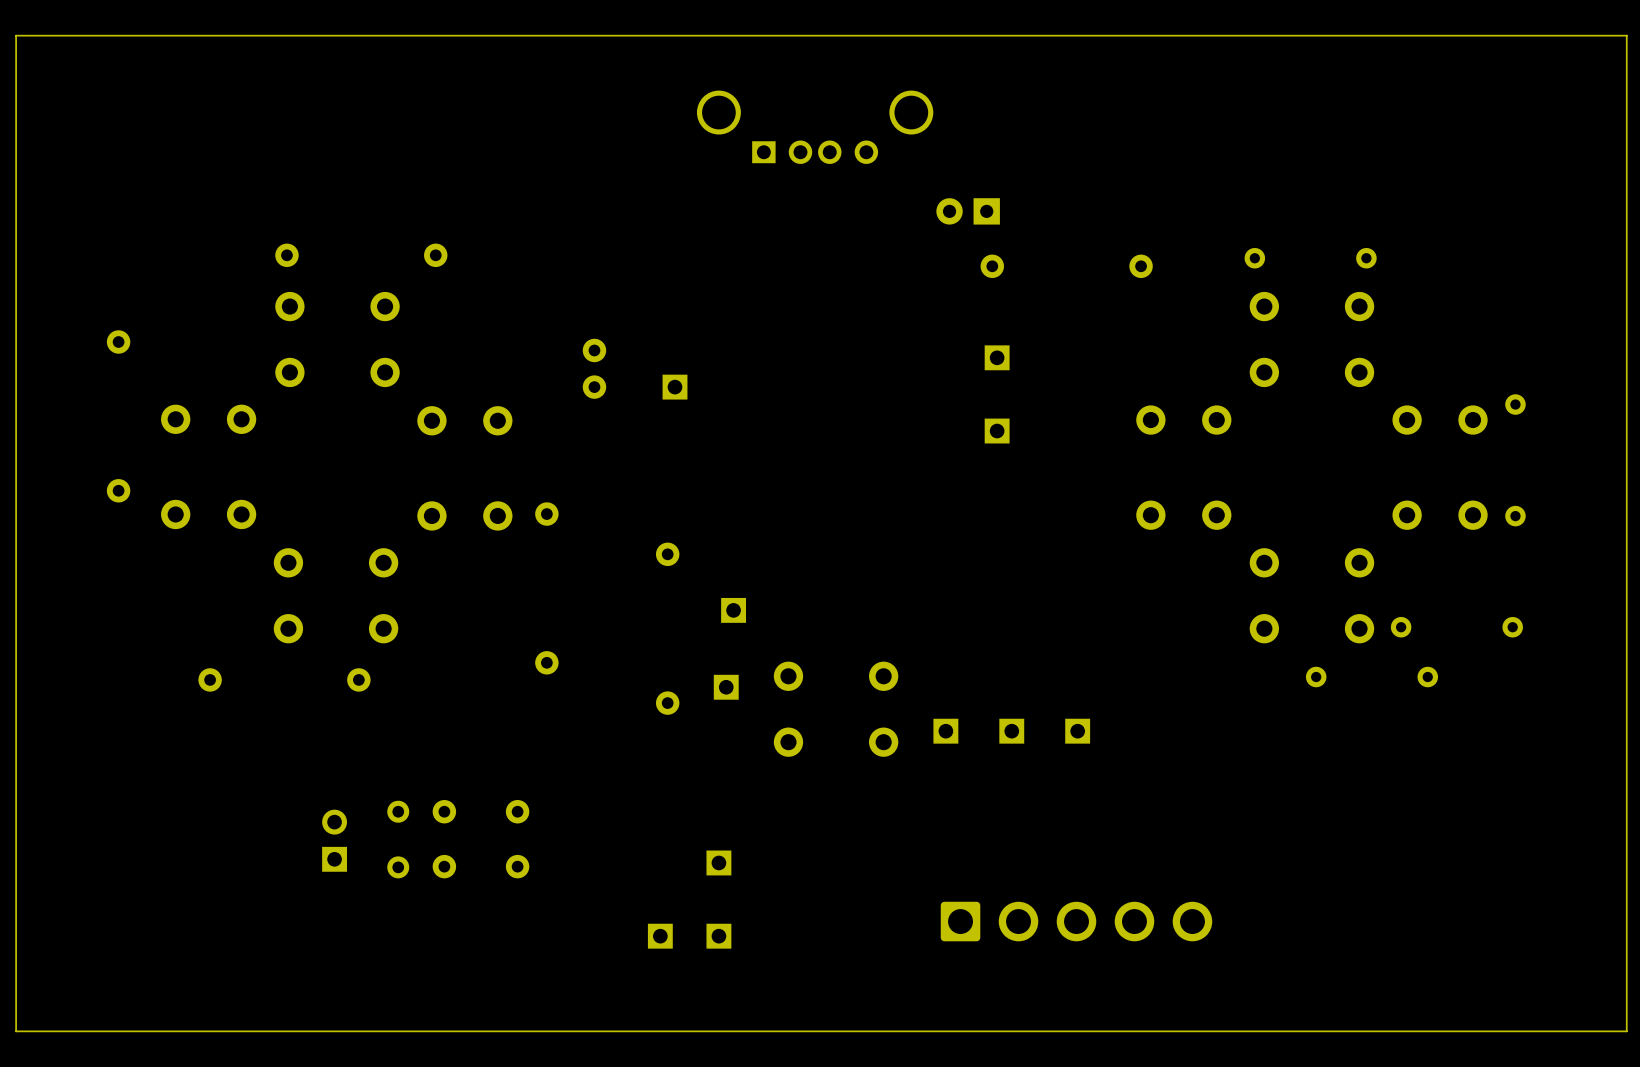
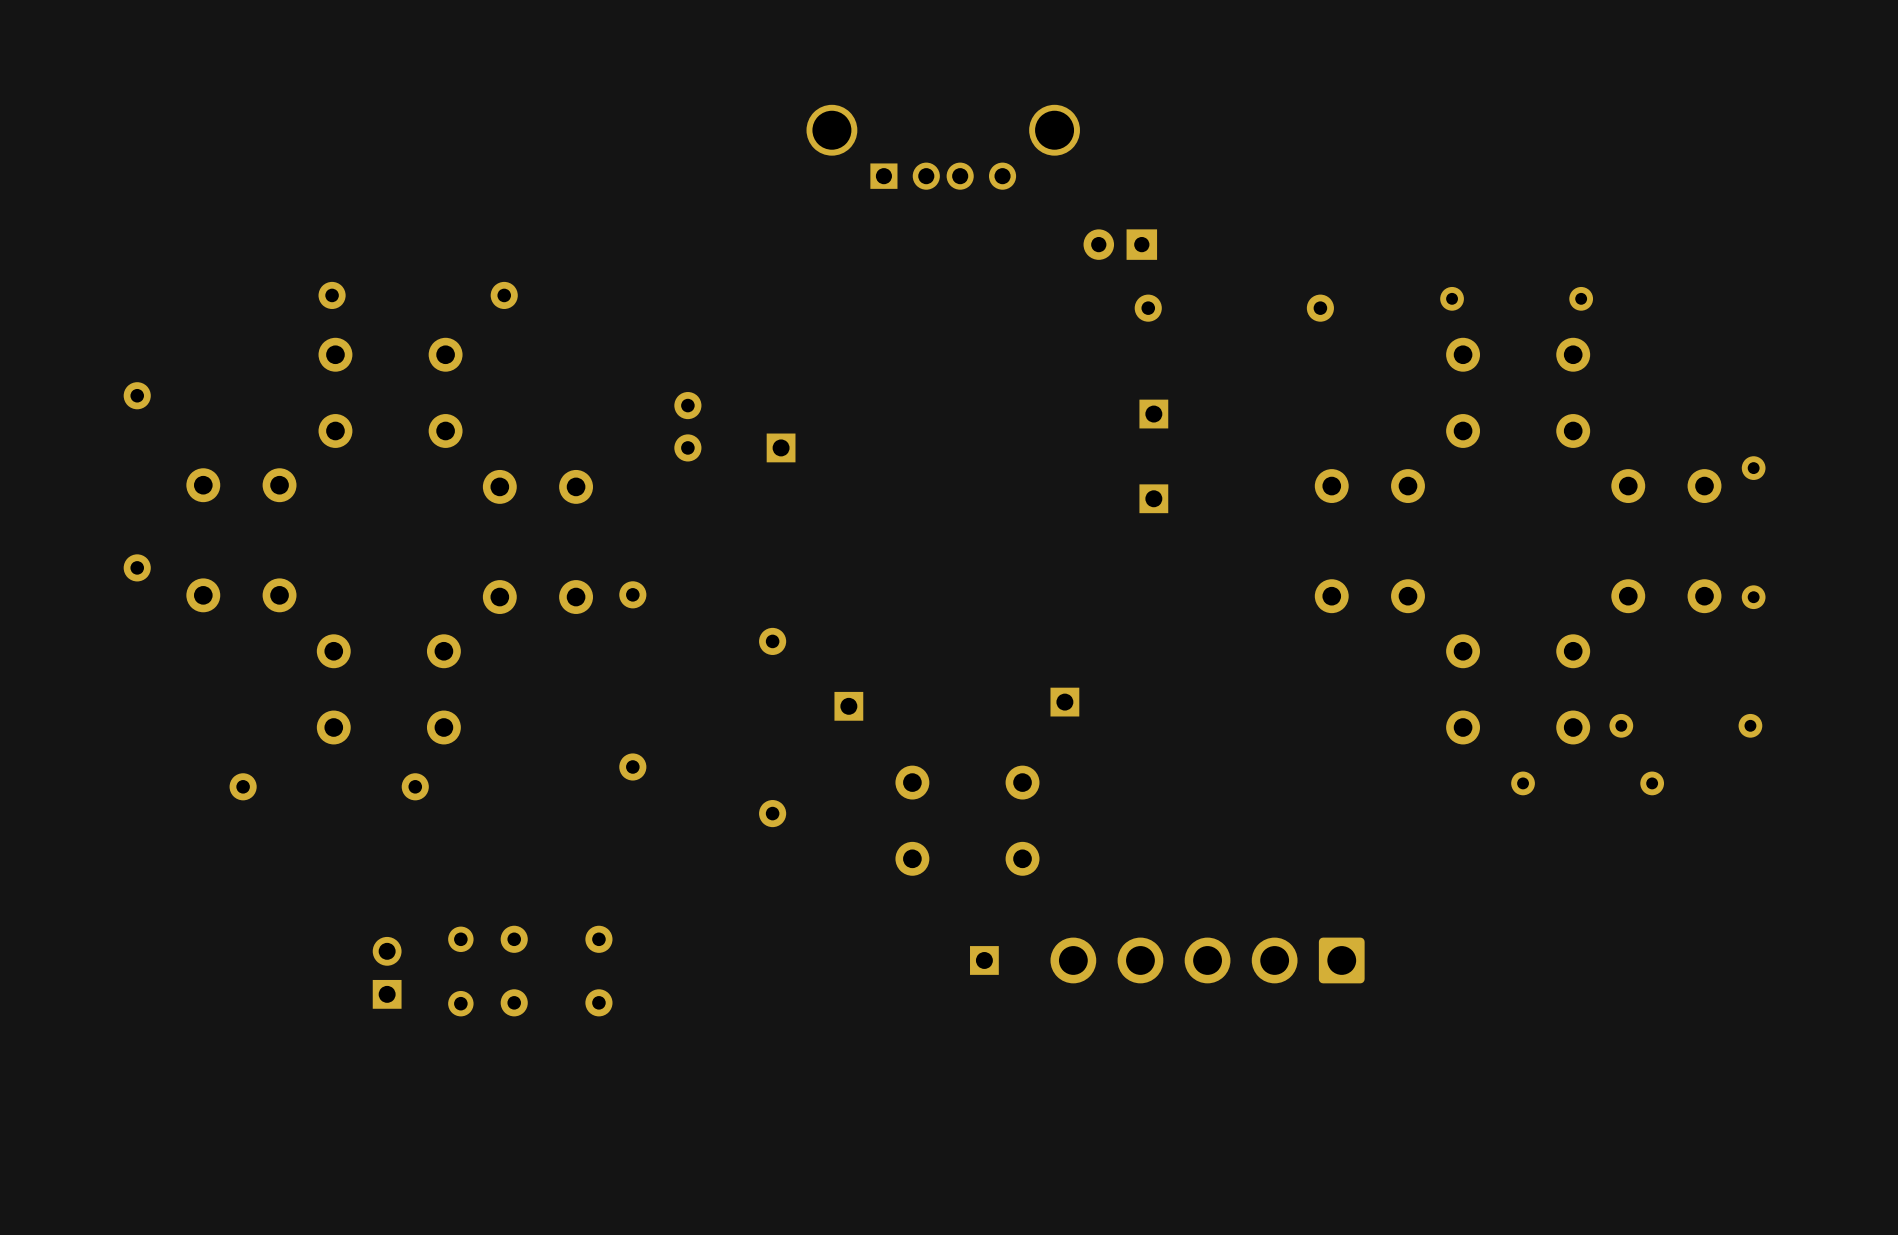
board edge: (1626, 35) (16, 35) (16, 1031) (1626, 1031) (1626, 35) -> none
part: none -> (1064, 702)
part: (726, 687) -> none
part: (945, 731) -> none
part: (1011, 731) -> none
part: (1077, 731) -> none
part: none -> (984, 960)
part: (718, 862) -> none
part rotation: 0° (1076, 921) -> 180° (1207, 960)
part: (660, 936) -> none
part: (718, 936) -> none

